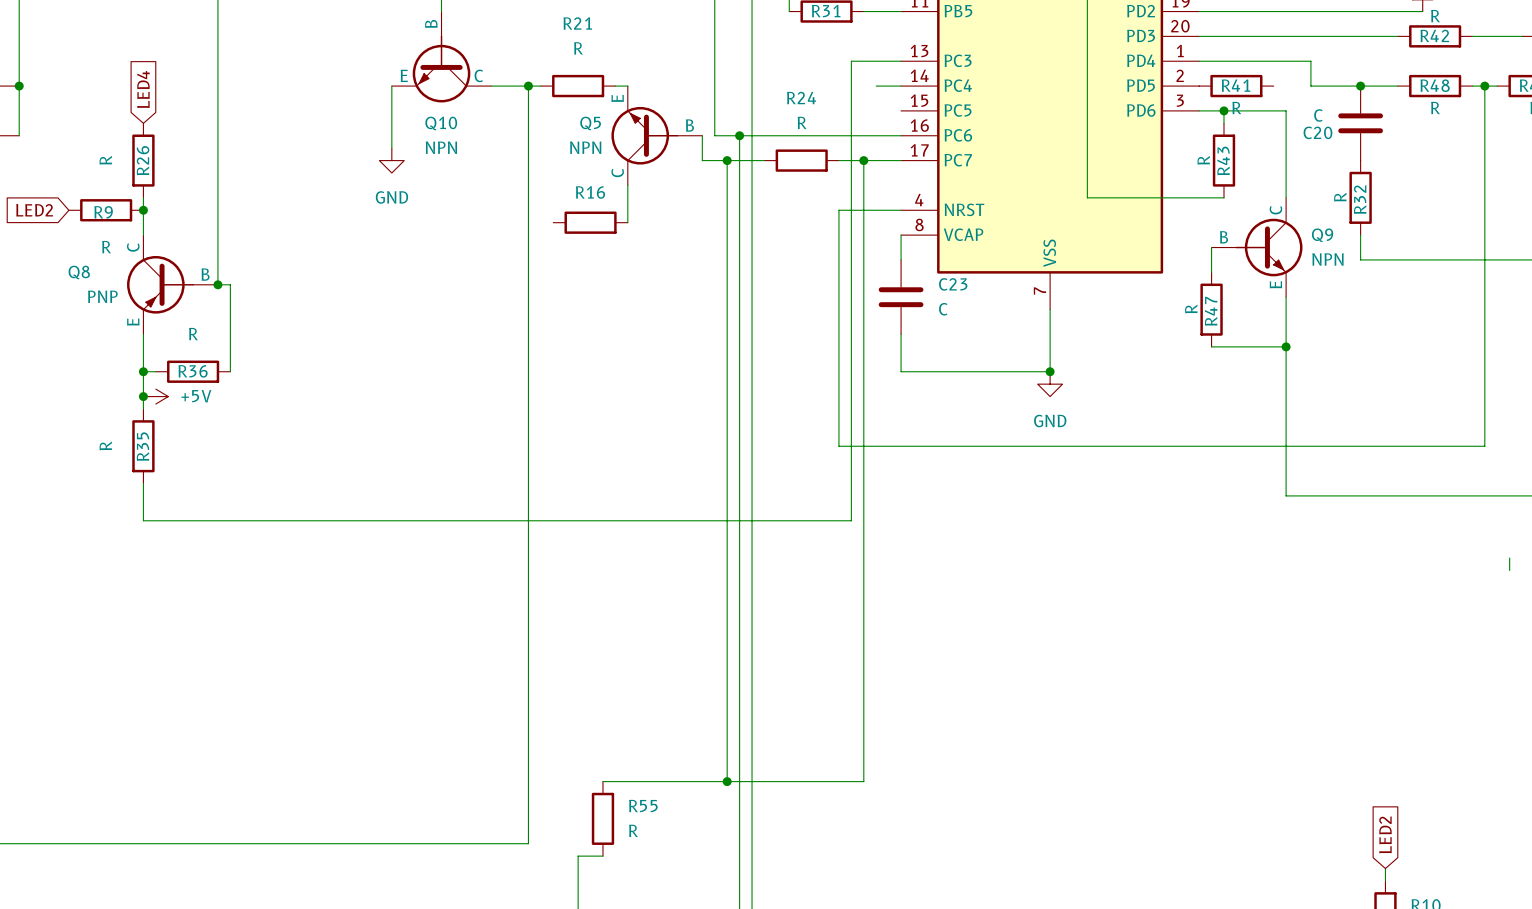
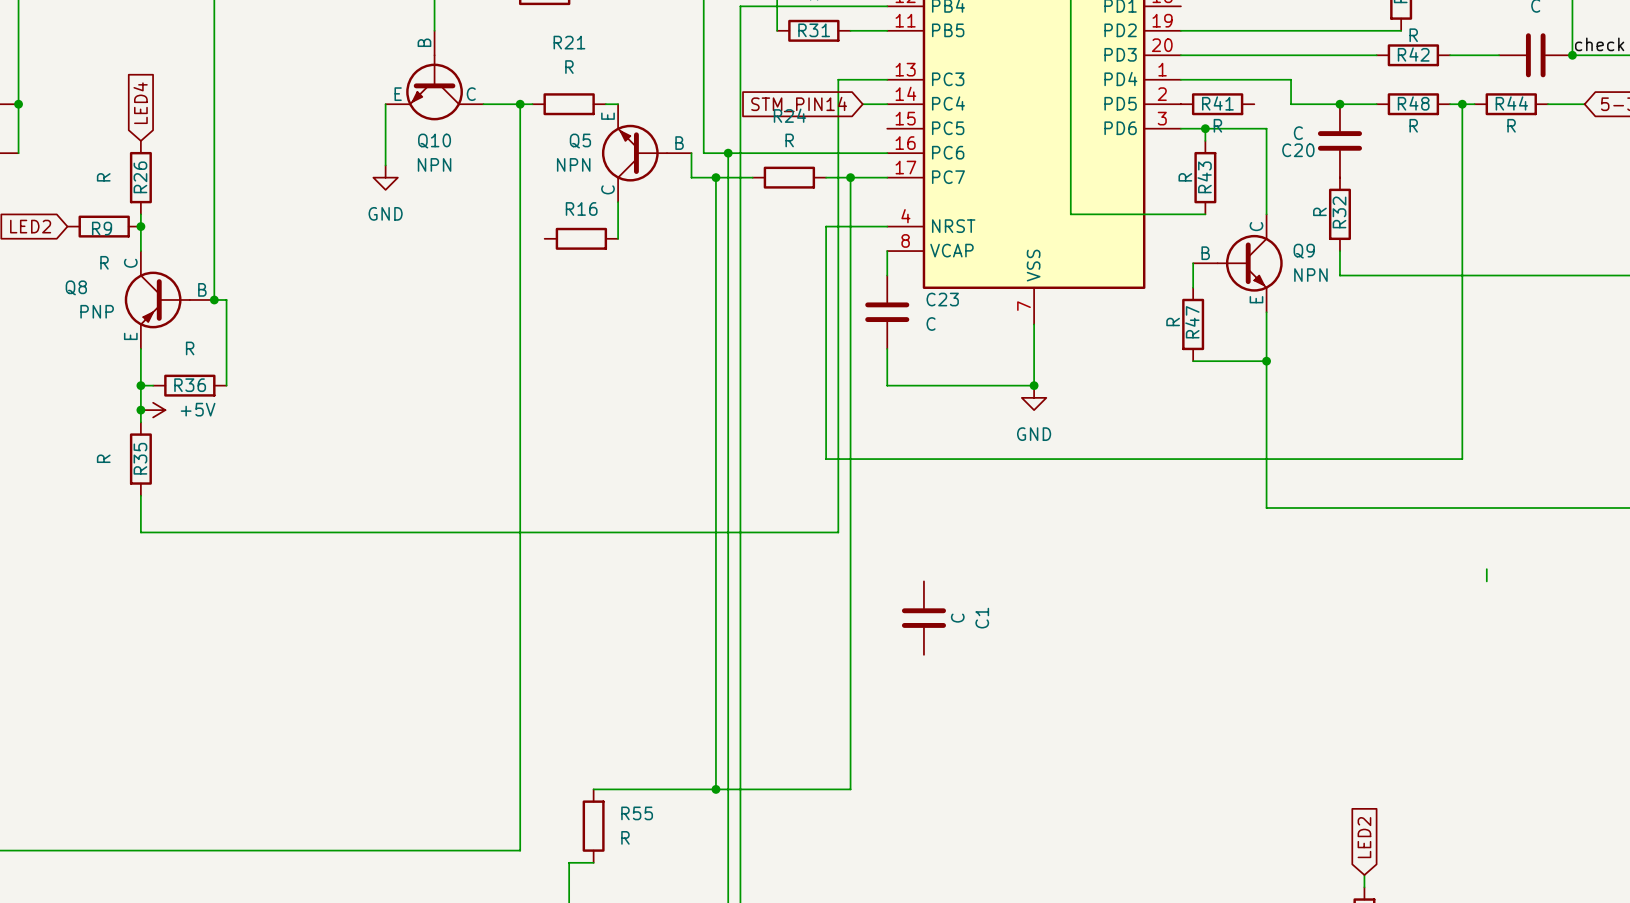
global label: none -> STM_PIN14 (799, 104)
C1: none -> C (923, 618)

